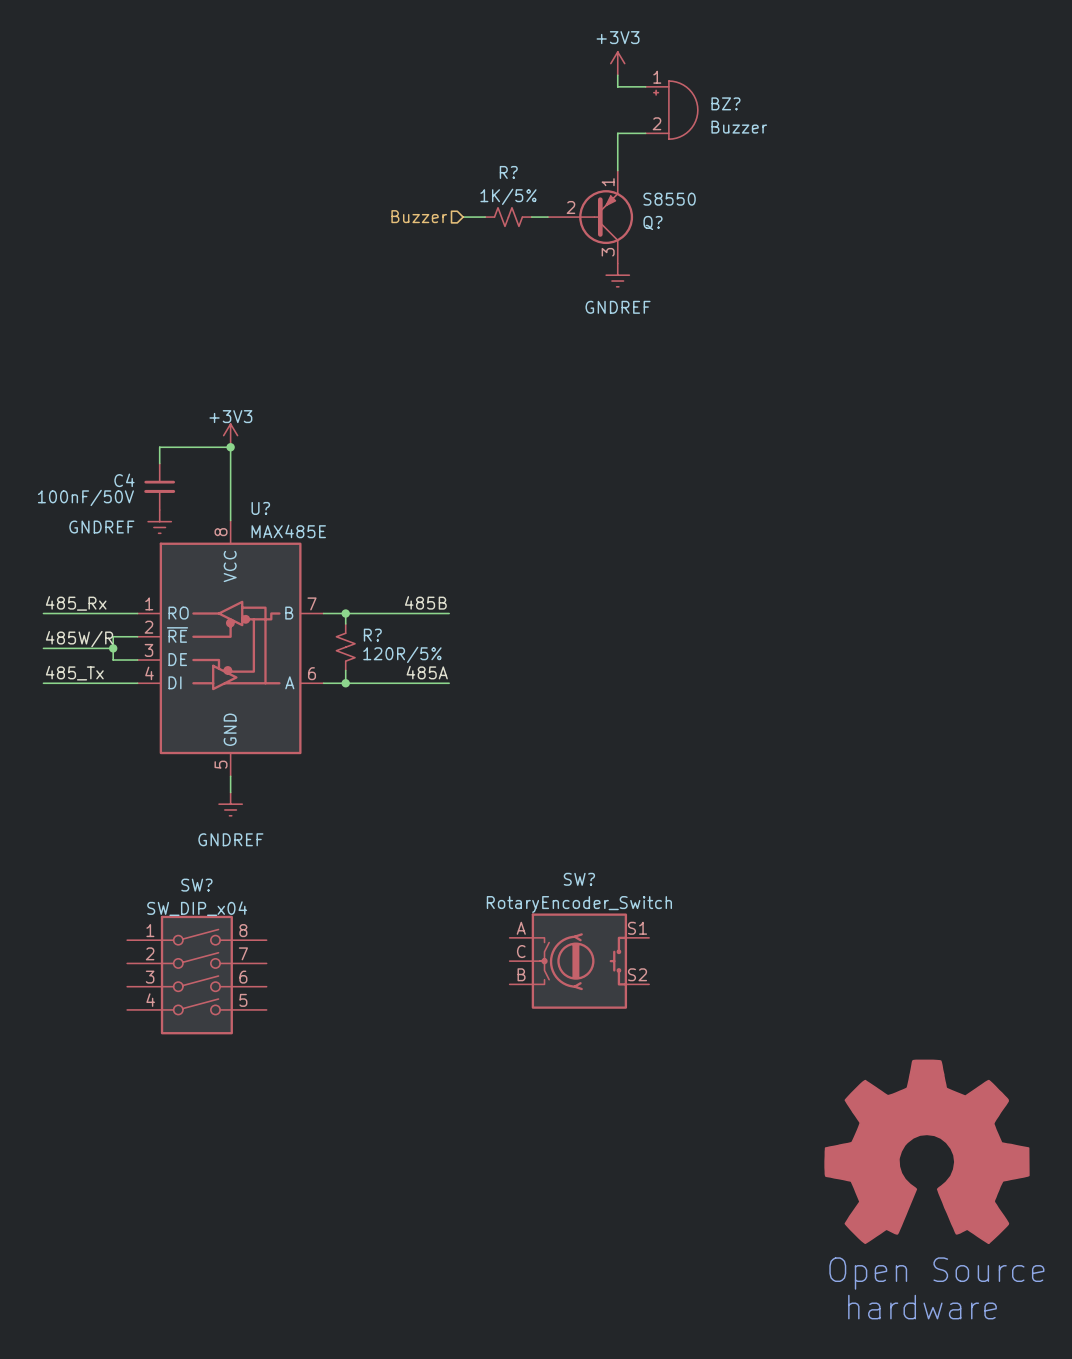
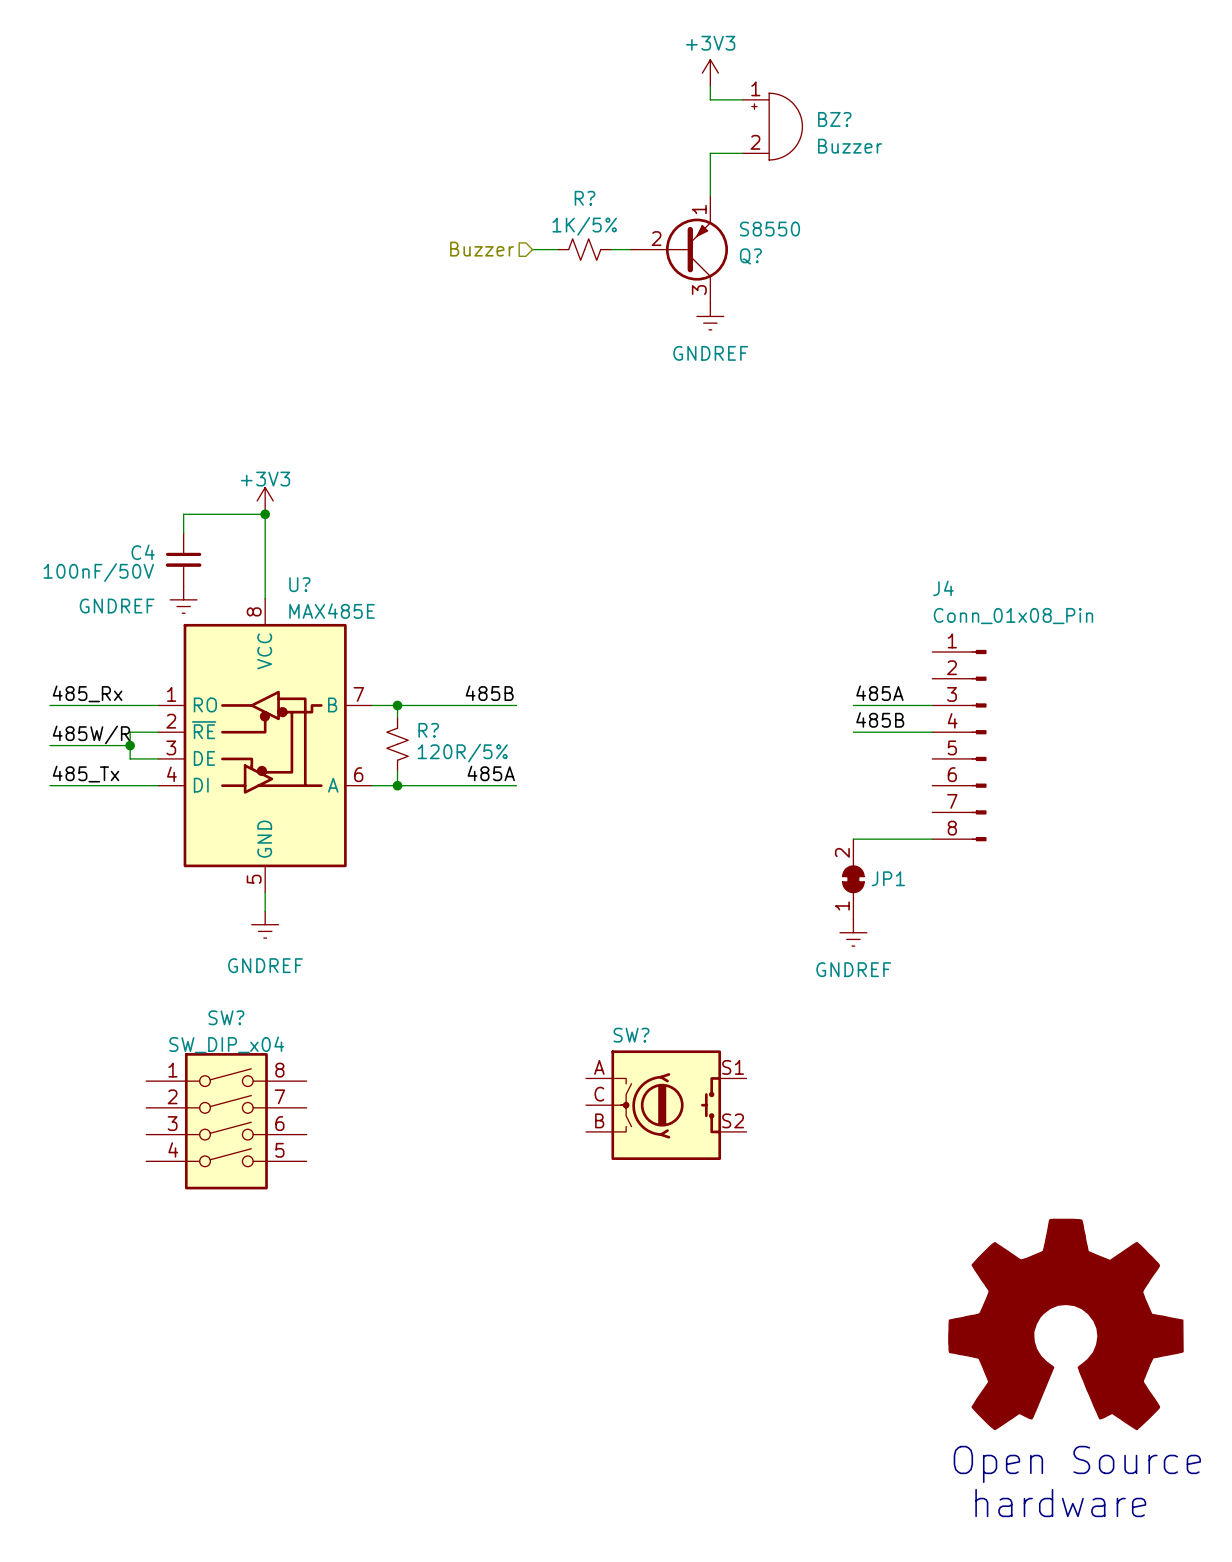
label: none -> 485A (879, 693)
wire: none -> (853, 705) (932, 705)
label: none -> 485B (880, 719)
wire: none -> (853, 732) (932, 732)
J4: none -> Conn_01x08_Pin (959, 745)
wire: none -> (853, 839) (932, 839)
JP1: none -> (853, 879)
power symbol: none -> GNDREF (853, 932)
SW? name position: SW? (579, 879) -> SW? (631, 1035)
SW? value: RotaryEncoder_Switch (579, 904) -> none

